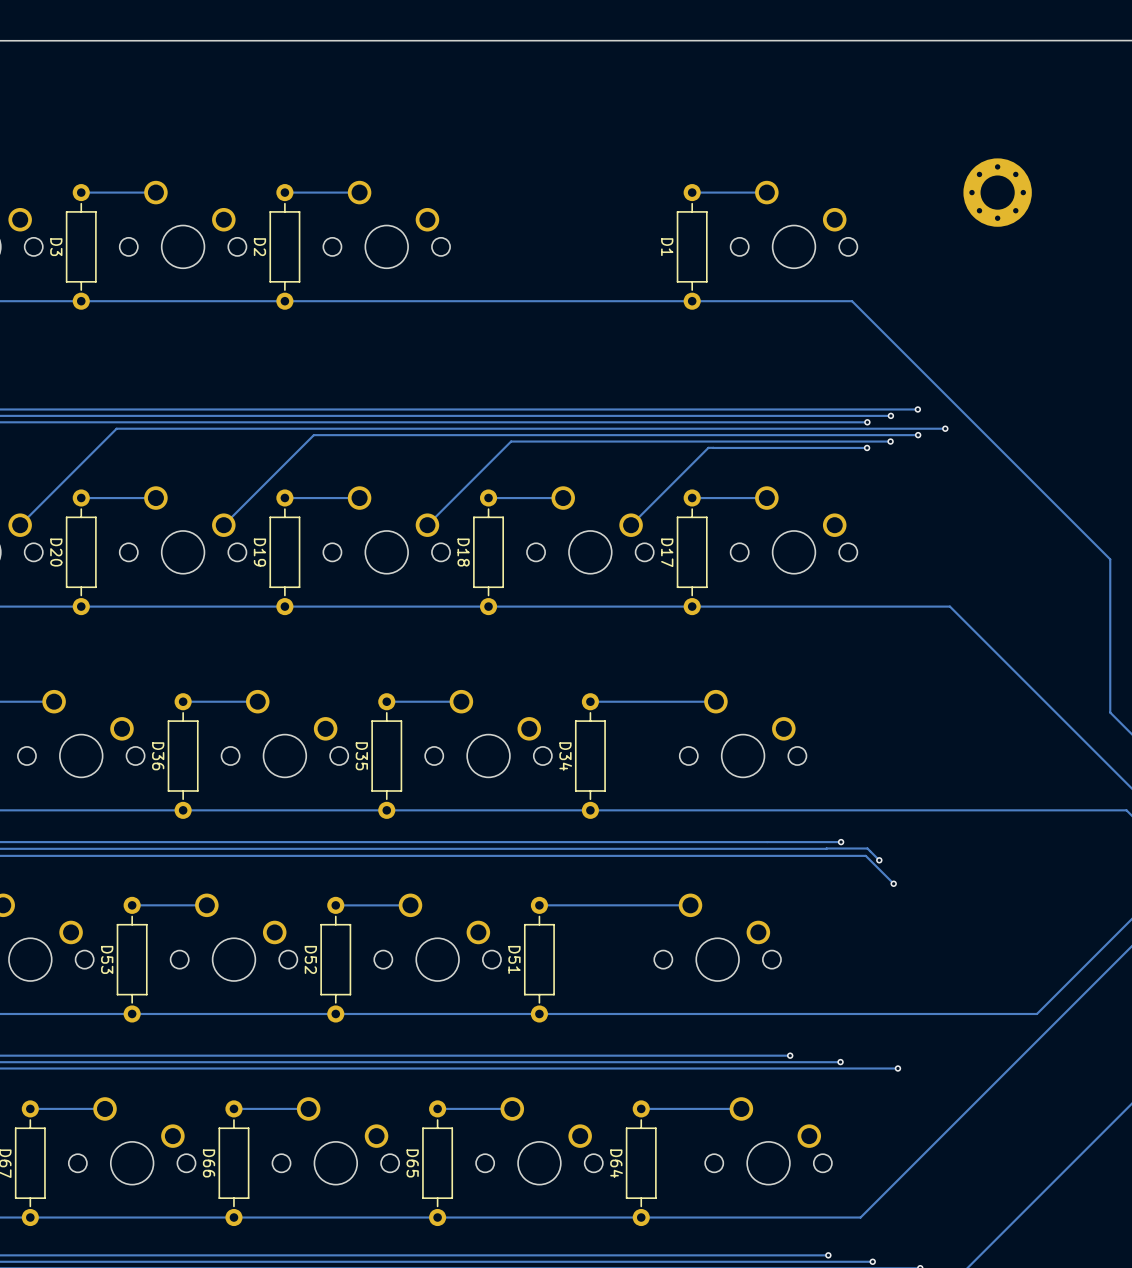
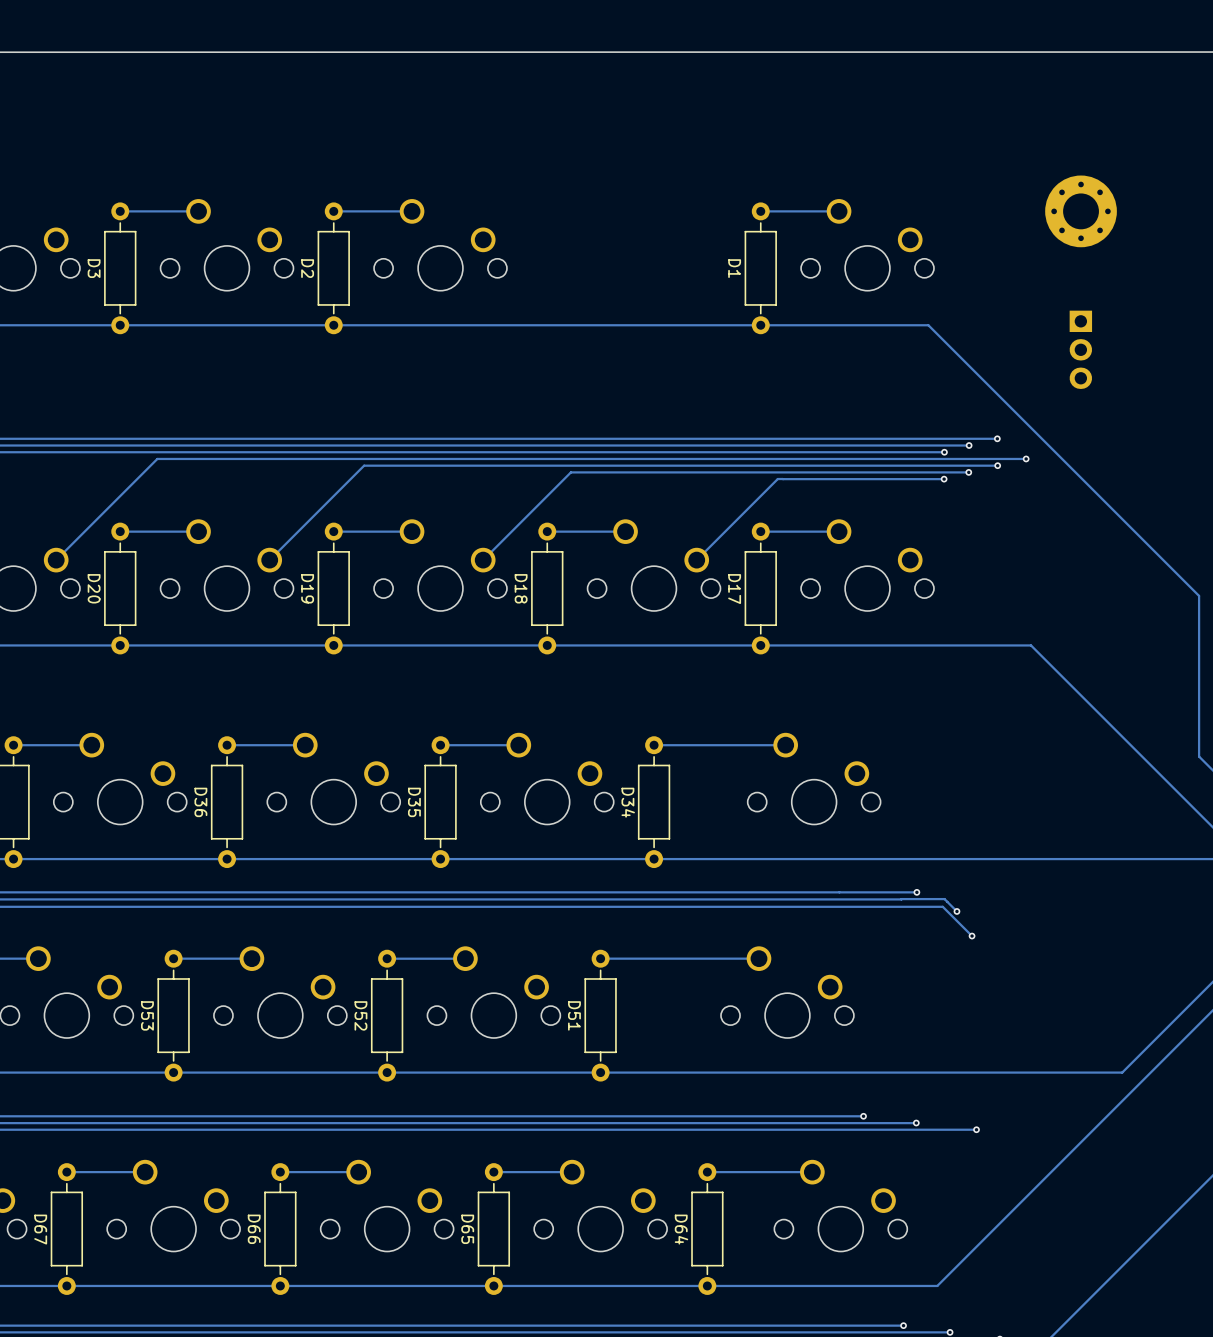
part: none -> (1080, 349)

